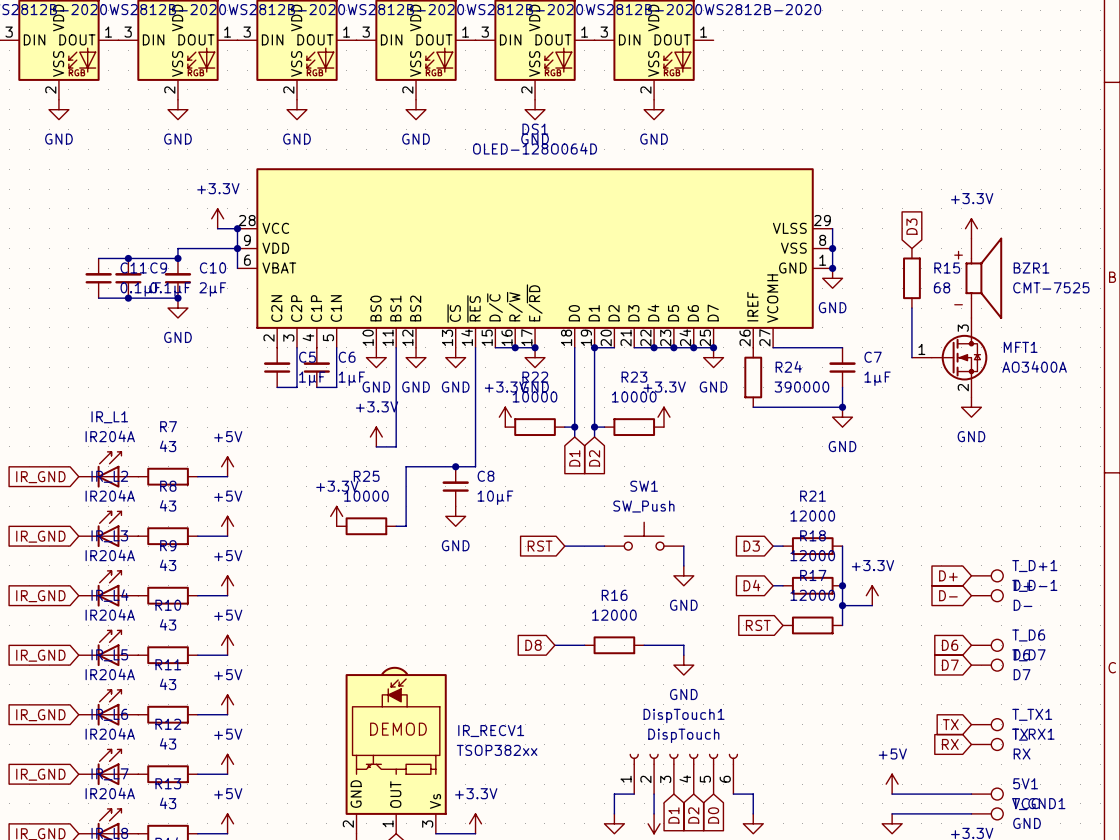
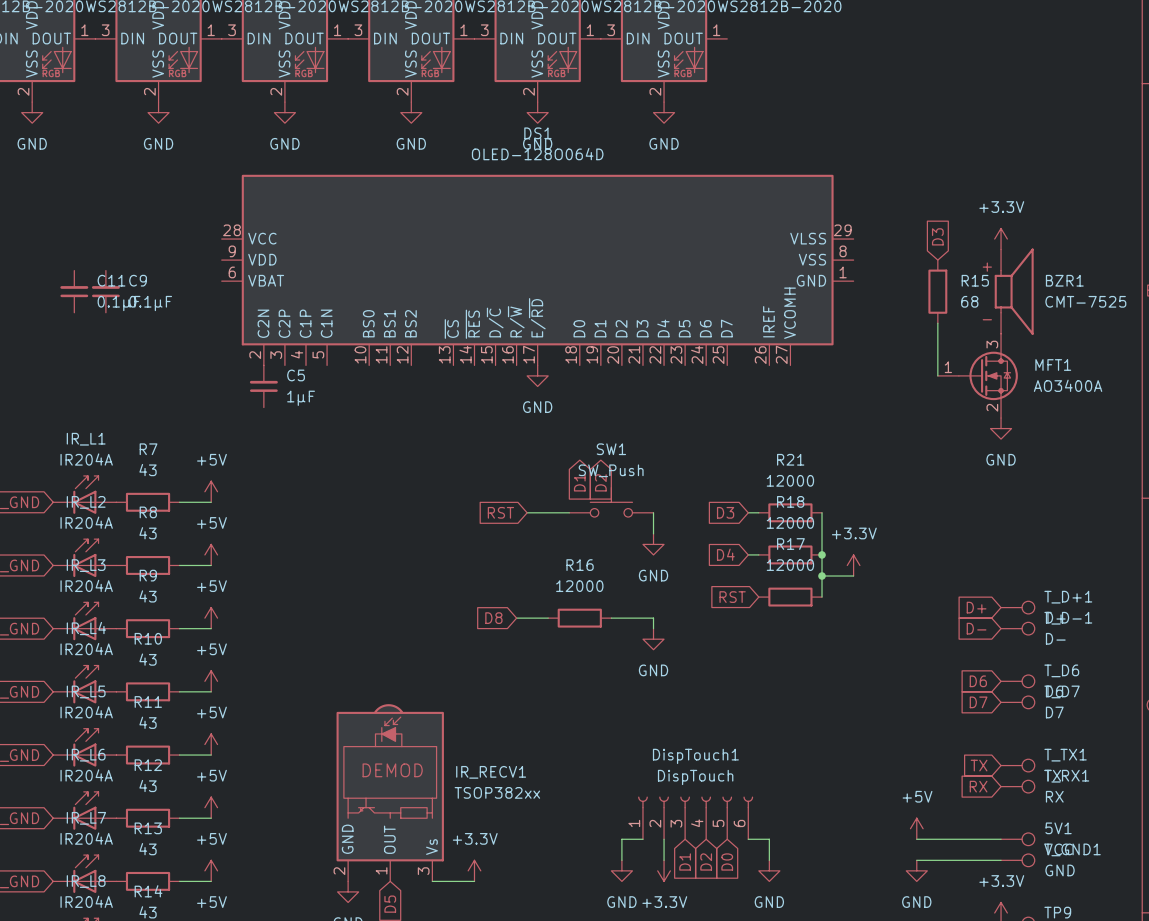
power symbol: +3.3V (217, 218) -> none
wire: (217, 228) (237, 228) (237, 268) -> none
junction: (237, 228) -> none
wire: (832, 228) (832, 268) -> none
wire: (237, 248) (177, 248) (177, 258) (98, 258) -> none
junction: (237, 248) -> none
junction: (832, 248) -> none
junction: (128, 258) -> none
junction: (177, 258) -> none
junction: (832, 268) -> none
C10: 2µF (177, 278) -> none
power symbol: GND (832, 278) -> none
wire: (98, 298) (177, 298) -> none
junction: (128, 298) -> none
junction: (177, 298) -> none
power symbol: GND (177, 308) -> none
wire: (297, 347) (297, 387) (277, 387) -> none
wire: (336, 347) (336, 387) (316, 387) -> none
wire: (396, 347) (396, 446) (376, 446) -> none
wire: (475, 347) (475, 466) (406, 466) (406, 526) (396, 526) -> none
wire: (495, 347) (535, 347) -> none
junction: (515, 347) -> none
junction: (535, 347) -> none
wire: (574, 347) (574, 437) -> none
junction: (594, 347) -> none
wire: (614, 347) (594, 347) (594, 437) -> none
wire: (634, 347) (713, 347) -> none
junction: (654, 347) -> none
junction: (673, 347) -> none
junction: (693, 347) -> none
junction: (713, 347) -> none
wire: (773, 347) (842, 347) -> none
power symbol: GND (376, 357) -> none
power symbol: GND (416, 357) -> none
power symbol: GND (455, 357) -> none
power symbol: GND (713, 357) -> none
C6: 1µF (316, 367) -> none
C7: 1µF (842, 367) -> none
R24: 390000 (753, 377) -> none
wire: (842, 387) (842, 407) (753, 407) -> none
junction: (842, 407) -> none
power symbol: +3.3V (505, 417) -> none
power symbol: +3.3V (663, 417) -> none
power symbol: GND (842, 417) -> none
R22: 10000 (535, 427) -> none
wire: (564, 427) (574, 427) -> none
junction: (574, 427) -> none
wire: (594, 427) (604, 427) -> none
junction: (594, 427) -> none
R23: 10000 (634, 427) -> none
power symbol: +3.3V (376, 437) -> none
junction: (455, 466) -> none
C8: 10µF (455, 486) -> none
power symbol: +3.3V (336, 516) -> none
power symbol: GND (455, 516) -> none
power symbol: none -> GND (653, 544)
R25: 10000 (366, 526) -> none
junction: none -> (822, 554)
SW1 position: (644, 536) -> (611, 502)
global label position: RST (540, 546) -> RST (500, 512)
wire: (564, 546) (604, 546) -> (527, 512) (569, 512)
wire: (683, 546) (683, 565) -> (653, 512) (653, 533)
global label position: D3 (751, 546) -> D3 (725, 512)
wire: (773, 546) (783, 546) -> (748, 512) (758, 512)
junction: none -> (822, 576)
R21 position: (812, 546) -> (790, 512)
wire: (842, 546) (842, 625) -> (822, 512) (822, 597)
power symbol: GND (683, 575) -> none
global label position: D4 (751, 585) -> D4 (725, 554)
wire: (773, 585) (783, 585) -> (748, 554) (758, 554)
R18 position: (812, 585) -> (790, 554)
junction: (842, 585) -> none
power symbol position: +3.3V (872, 595) -> +3.3V (853, 565)
power symbol: none -> GND (653, 639)
wire: (842, 605) (872, 605) -> (822, 576) (853, 576)
junction: (842, 605) -> none
global label position: RST (758, 625) -> RST (732, 597)
R17 position: (812, 625) -> (790, 597)
global label position: D8 (533, 645) -> D8 (493, 618)
wire: (554, 645) (584, 645) -> (516, 618) (548, 618)
R16 position: (614, 645) -> (579, 618)
wire: (644, 645) (683, 645) (683, 655) -> (611, 618) (653, 618) (653, 628)
power symbol: GND (683, 665) -> none

